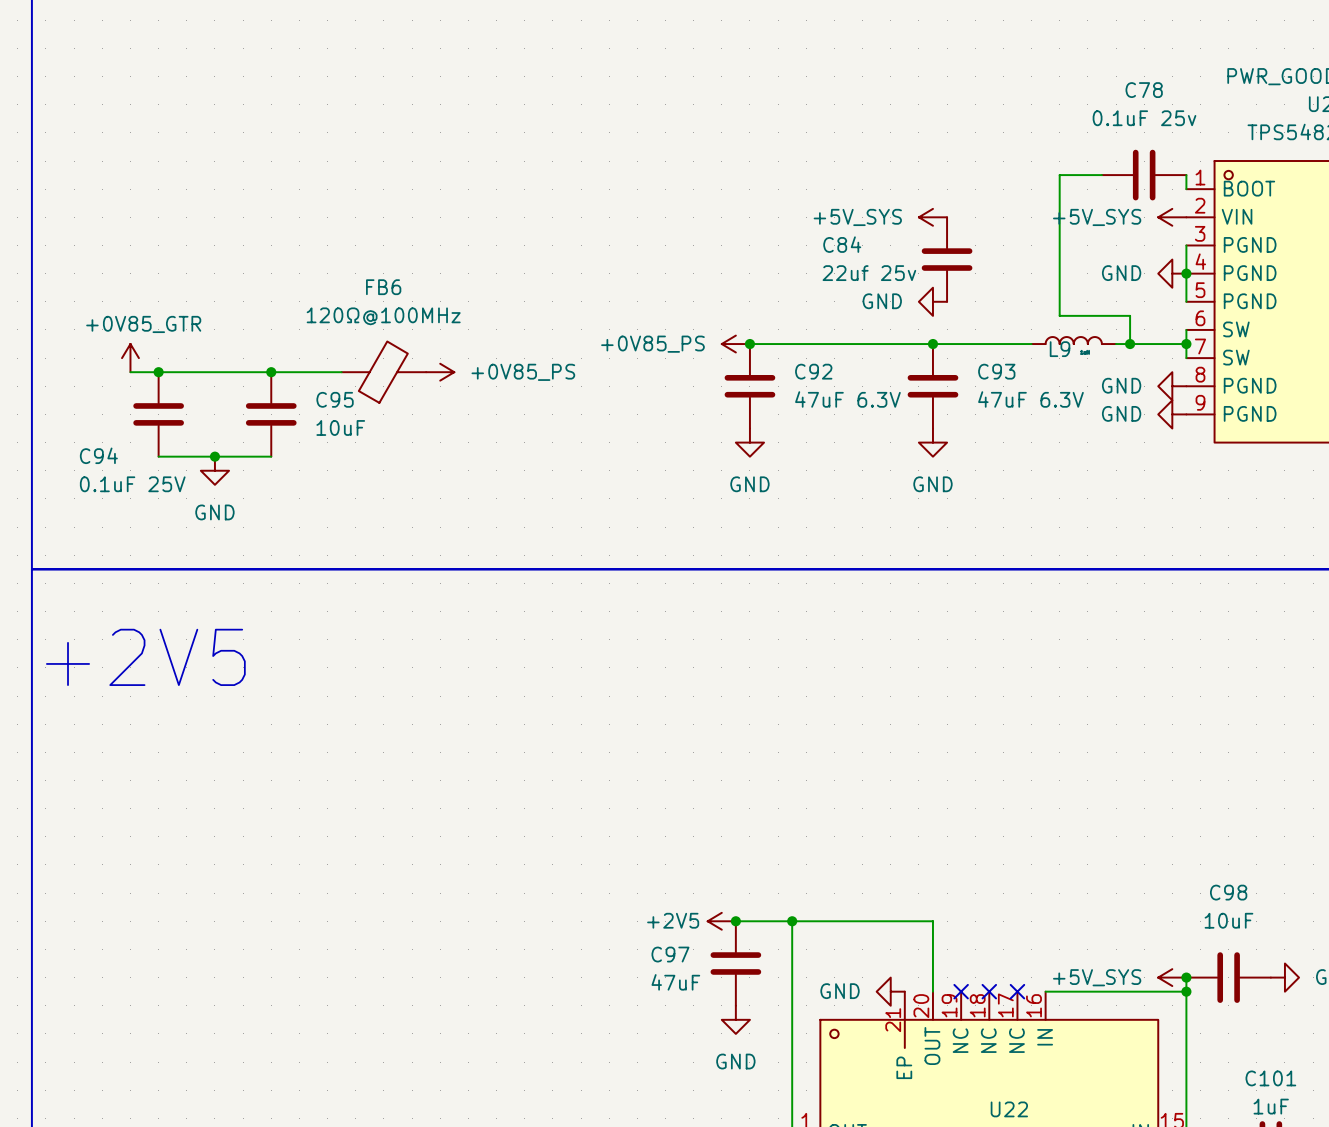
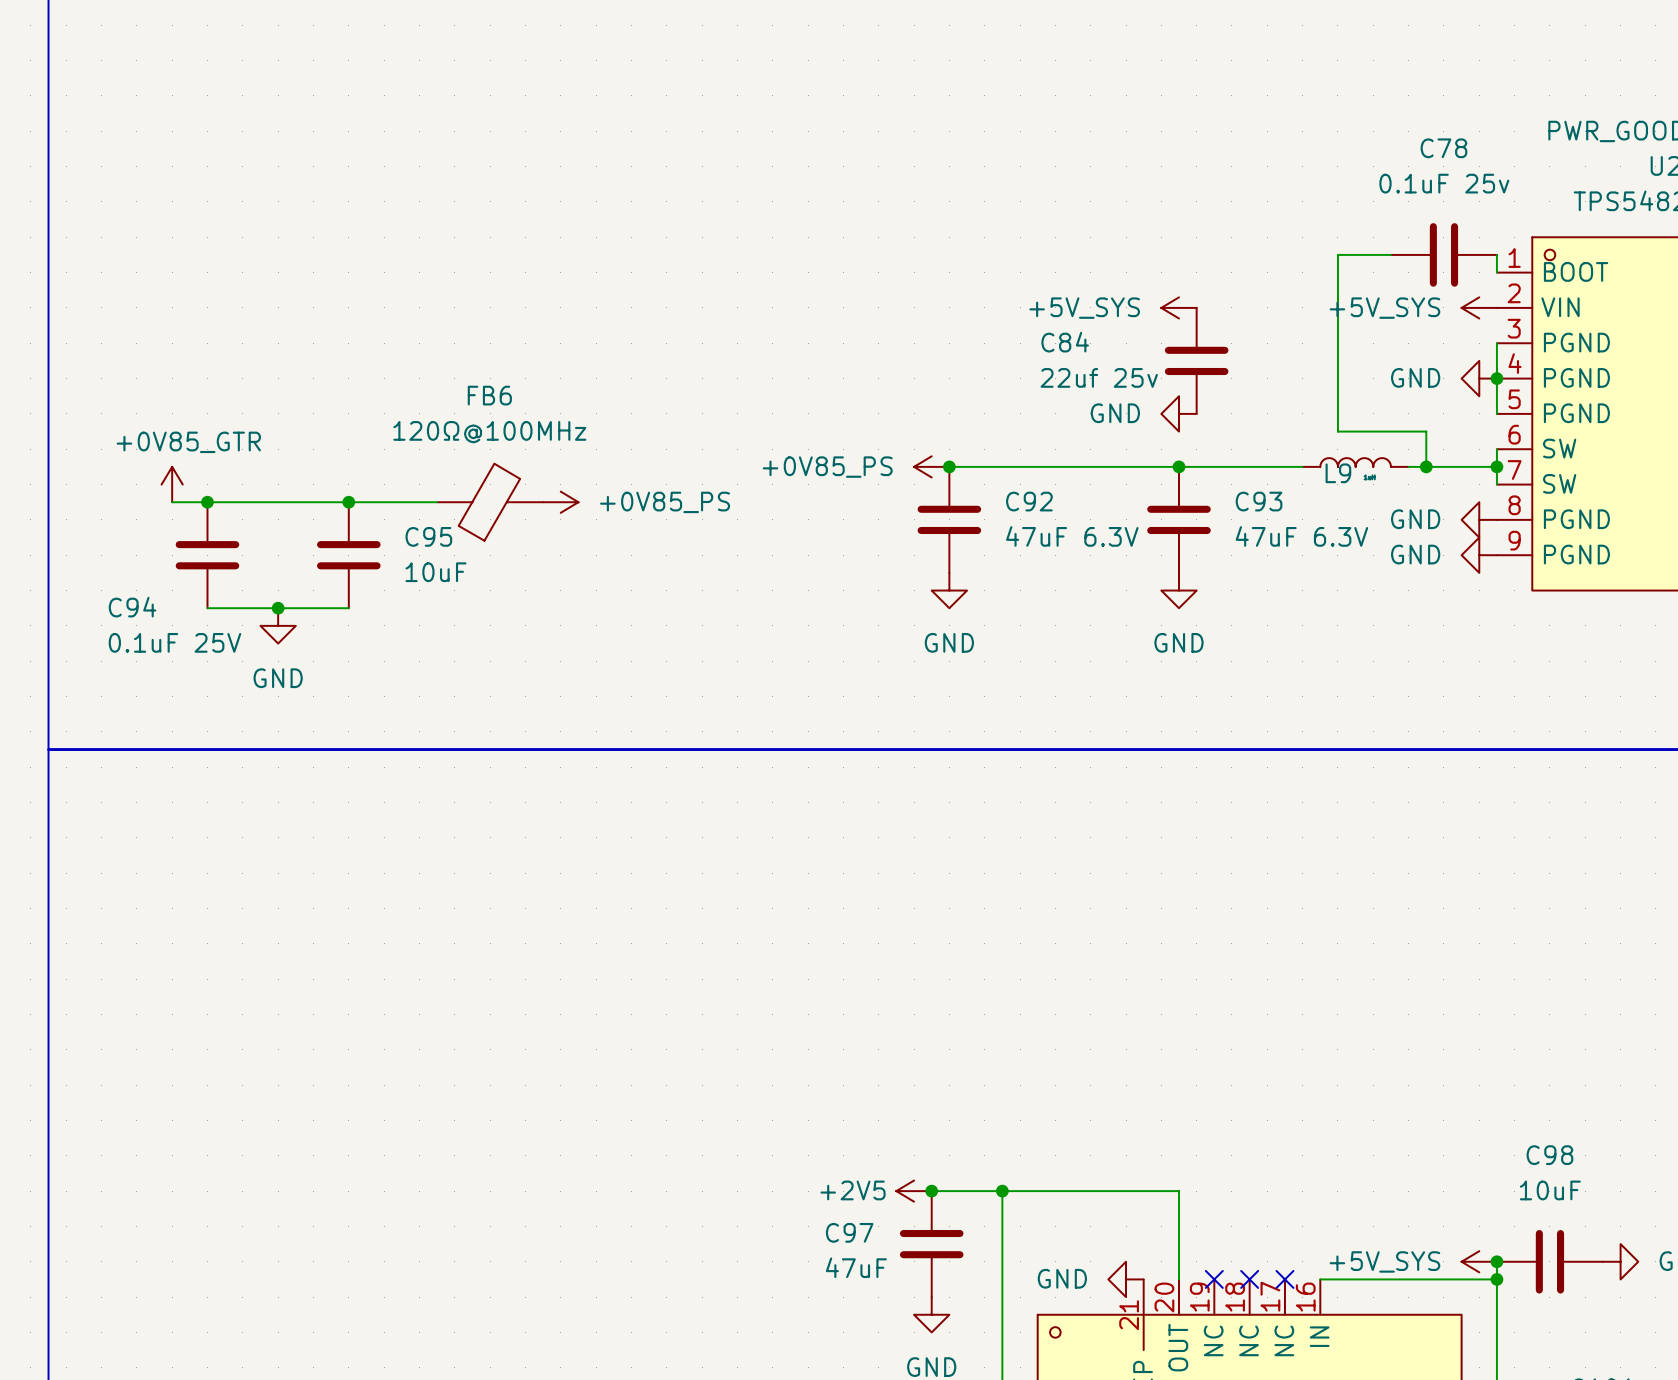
text: +2V5 (145, 657) -> none

